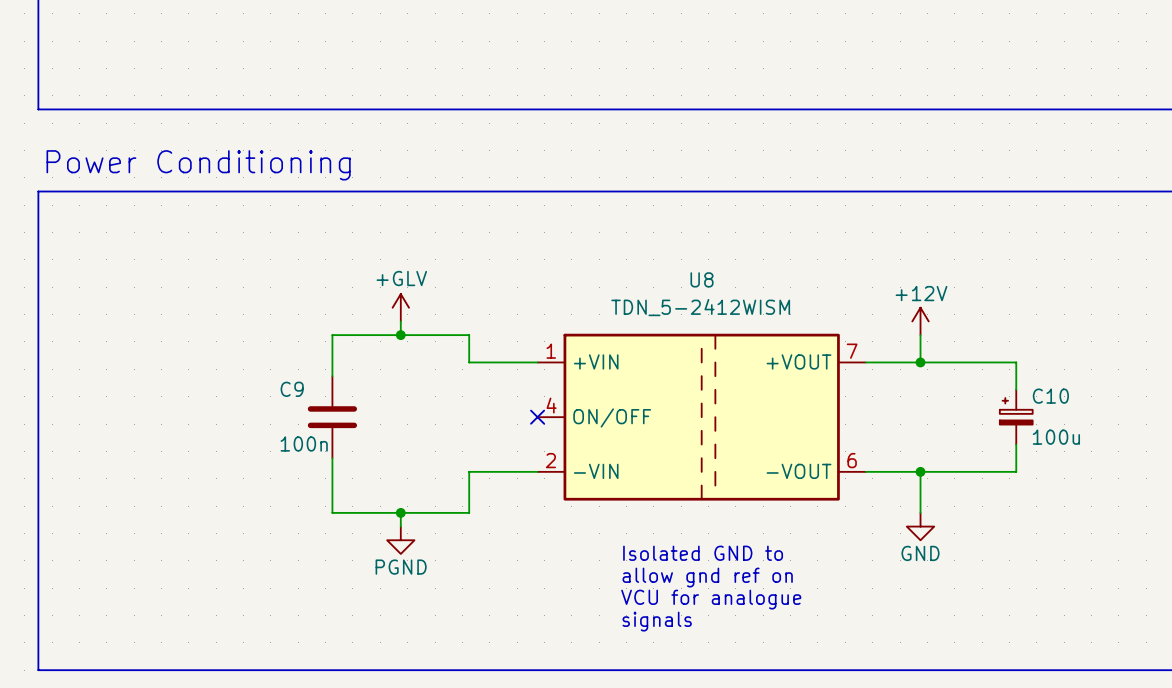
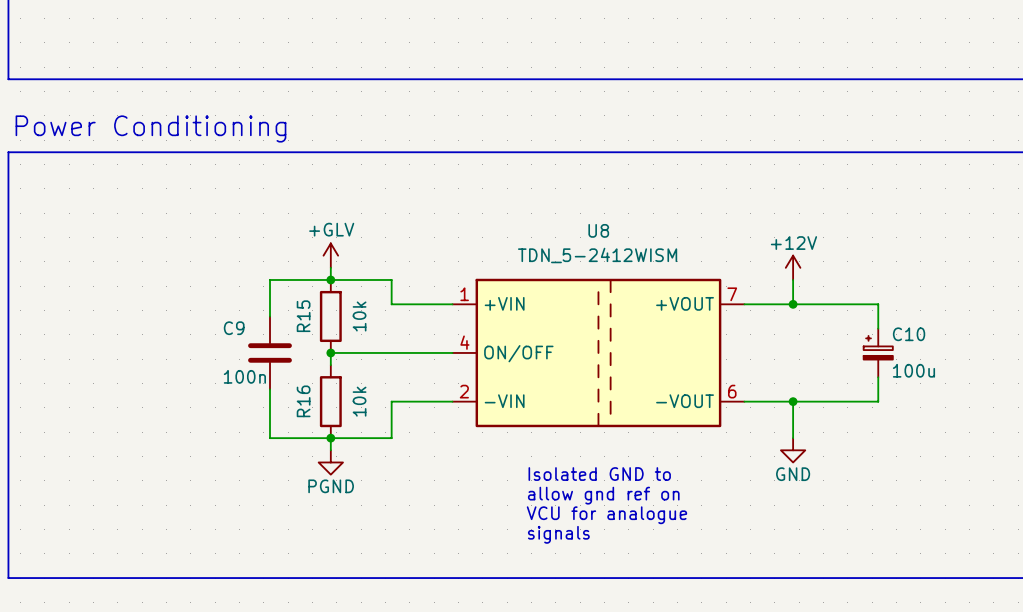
R15: none -> 10k (330, 316)
junction: none -> (330, 352)
wire: none -> (452, 352) (330, 352) (330, 365)
no-connect mark: (537, 417) -> none
R16: none -> 10k (330, 401)

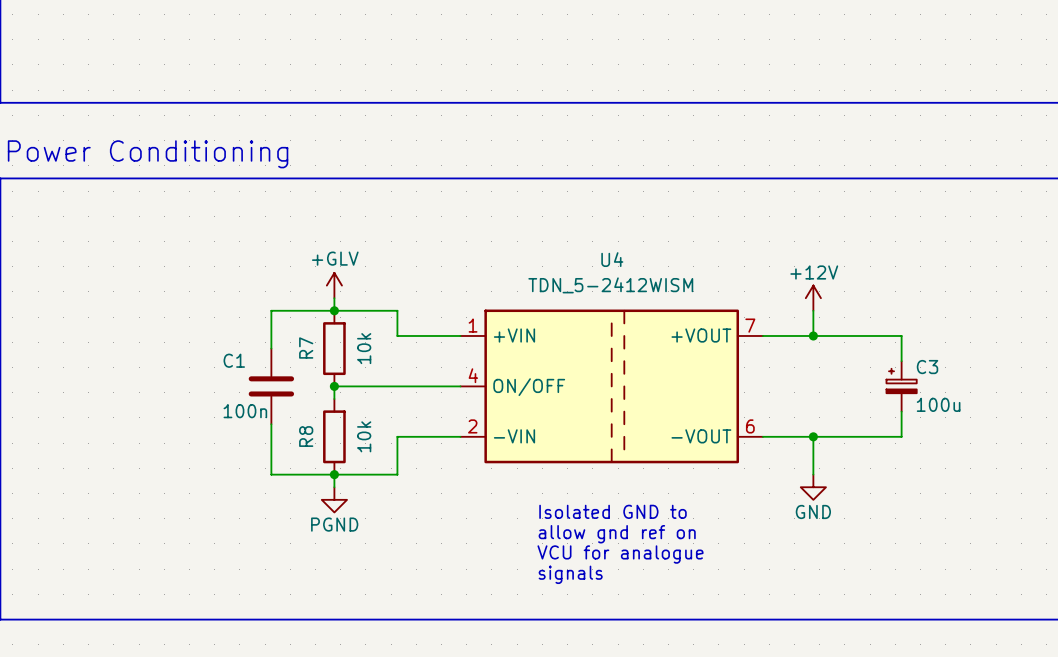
U8 name: U8 (598, 230) -> U4 (612, 259)
R15 name: R15 (303, 316) -> R7 (306, 347)
C9 name: C9 (234, 328) -> C1 (234, 360)
C10 name: C10 (909, 334) -> C3 (927, 367)
R16 name: R16 (303, 401) -> R8 (306, 436)

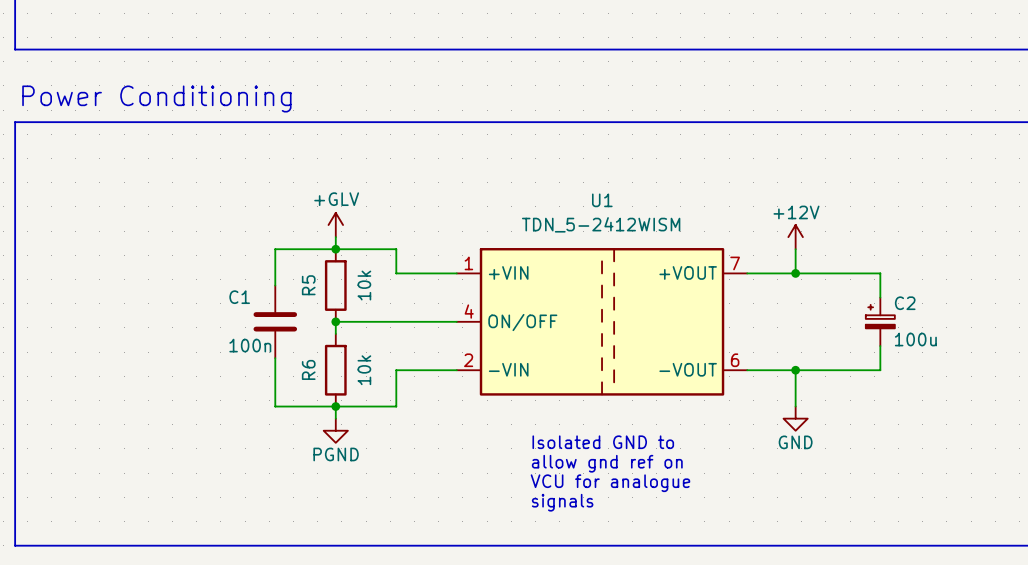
U4 name: U4 (612, 259) -> U1 (602, 200)
R7 name: R7 (306, 347) -> R5 (308, 285)
C3 name: C3 (927, 367) -> C2 (905, 303)
R8 name: R8 (306, 436) -> R6 (308, 369)

